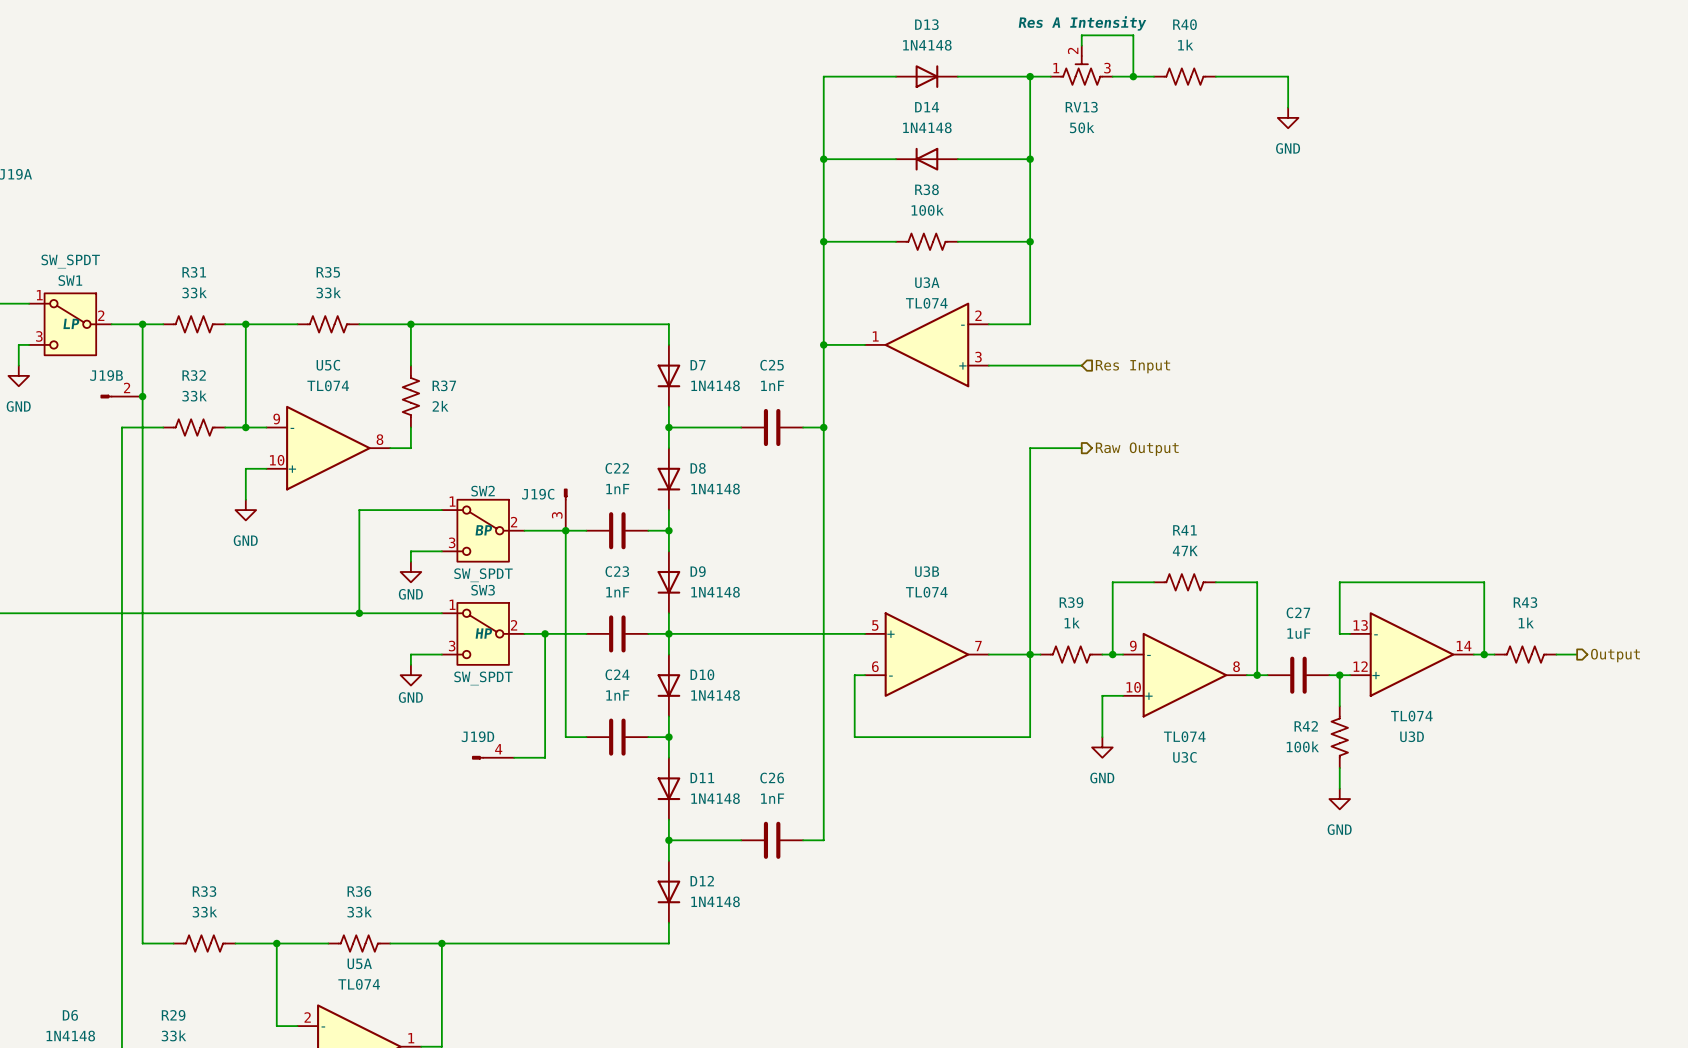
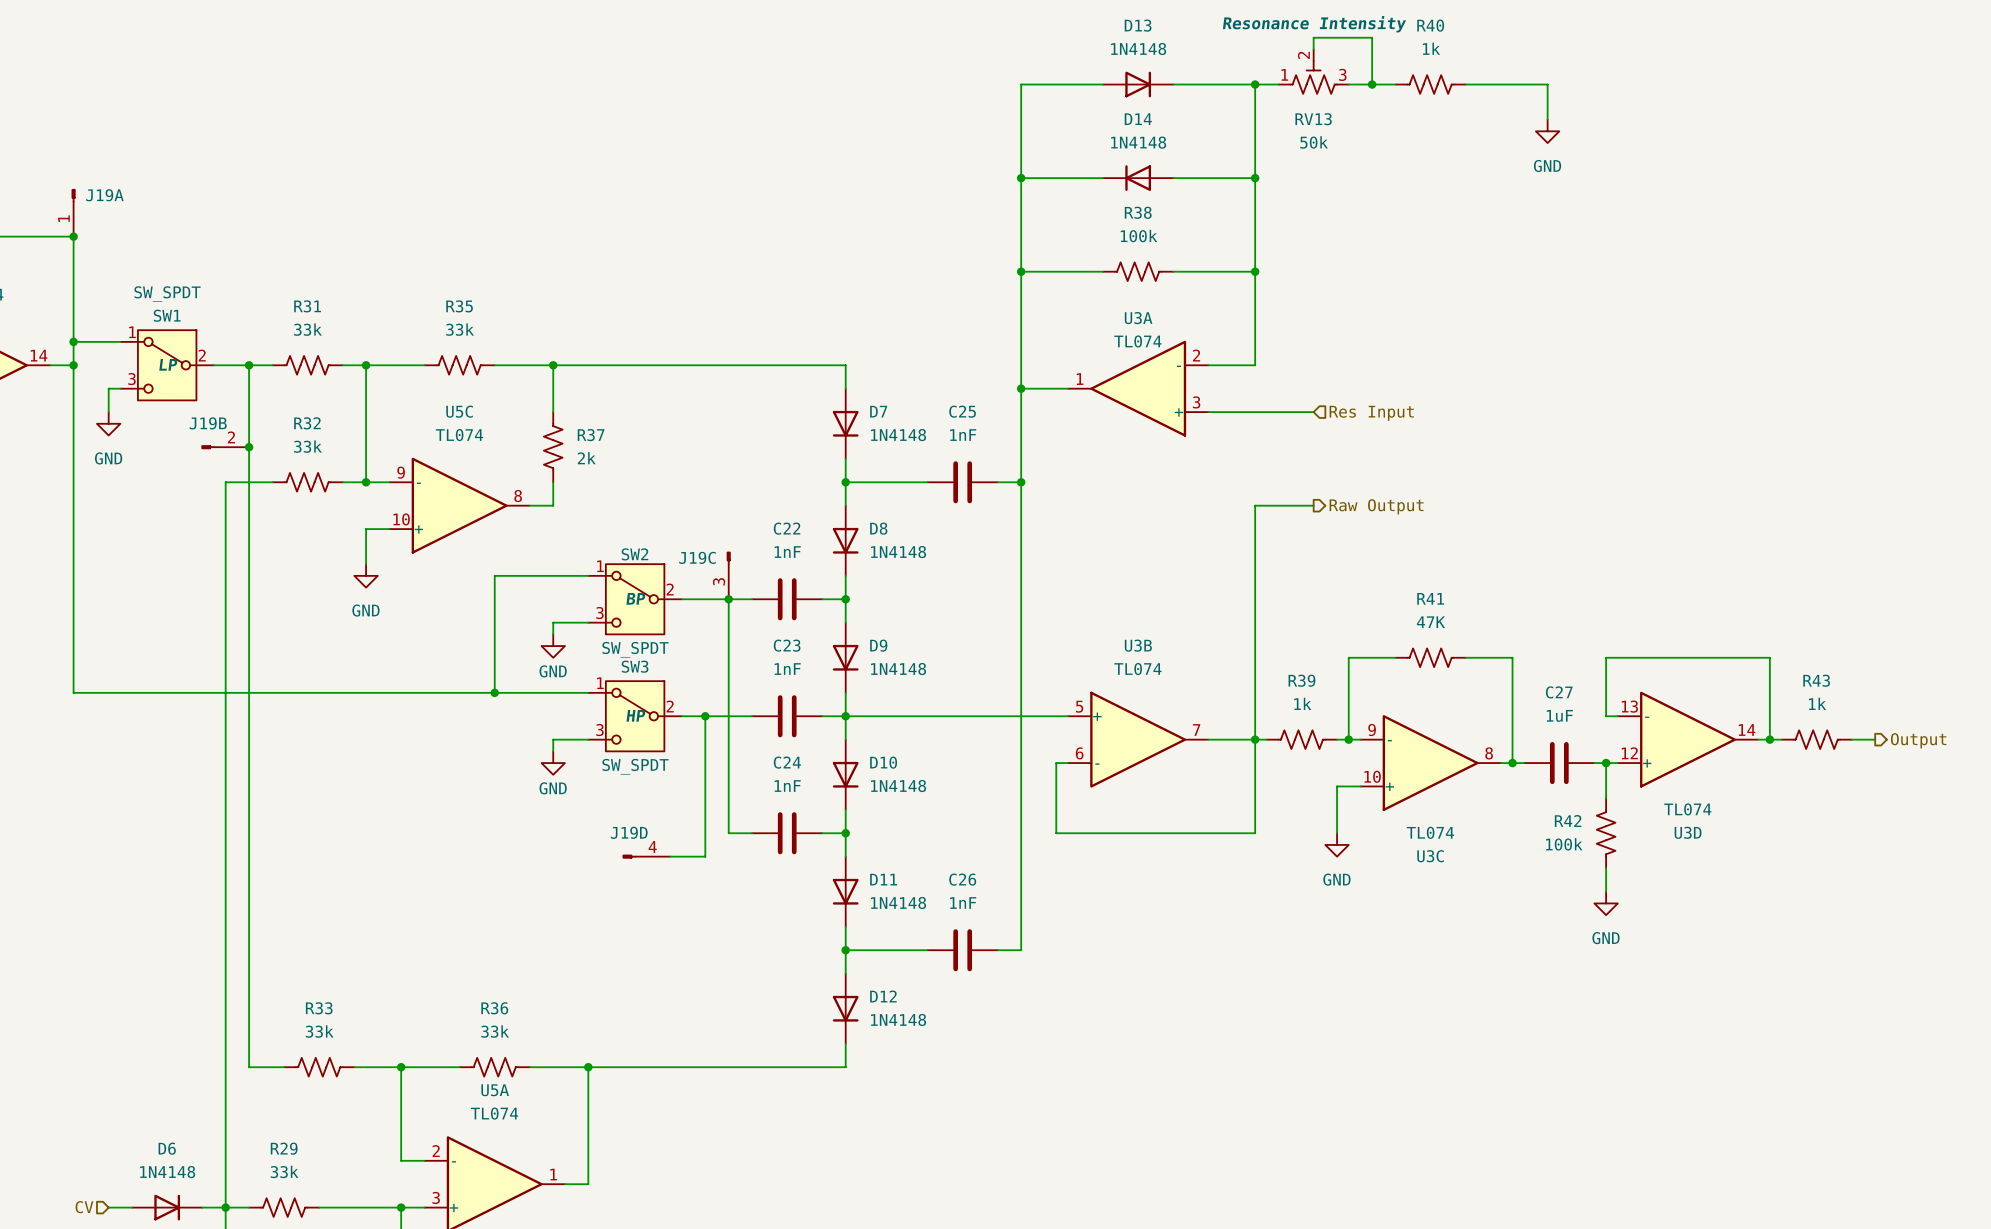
RV13 text: Res A Intensity (1082, 23) -> Resonance Intensity (1314, 24)

